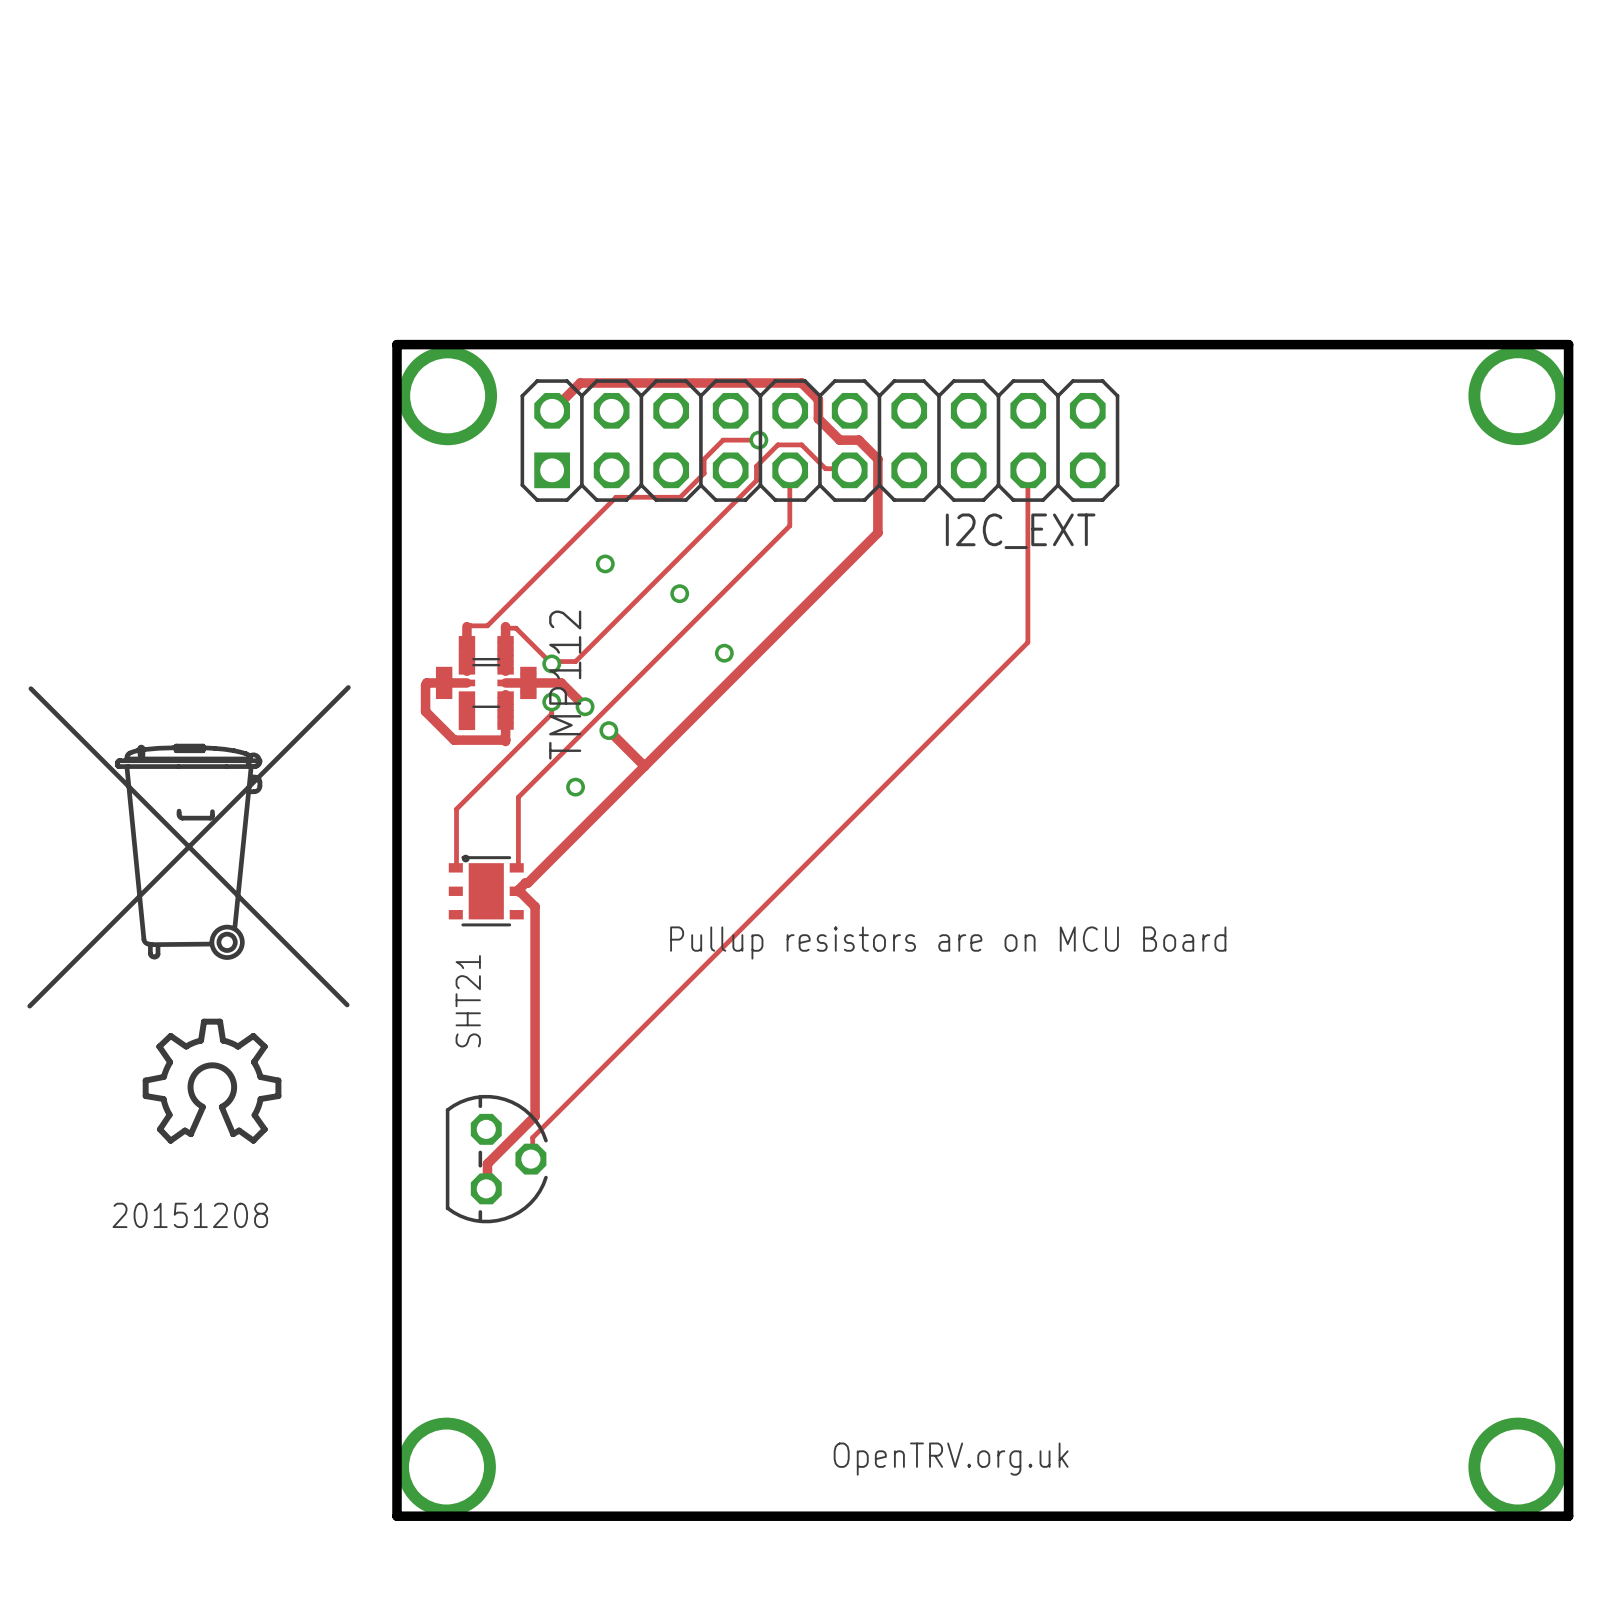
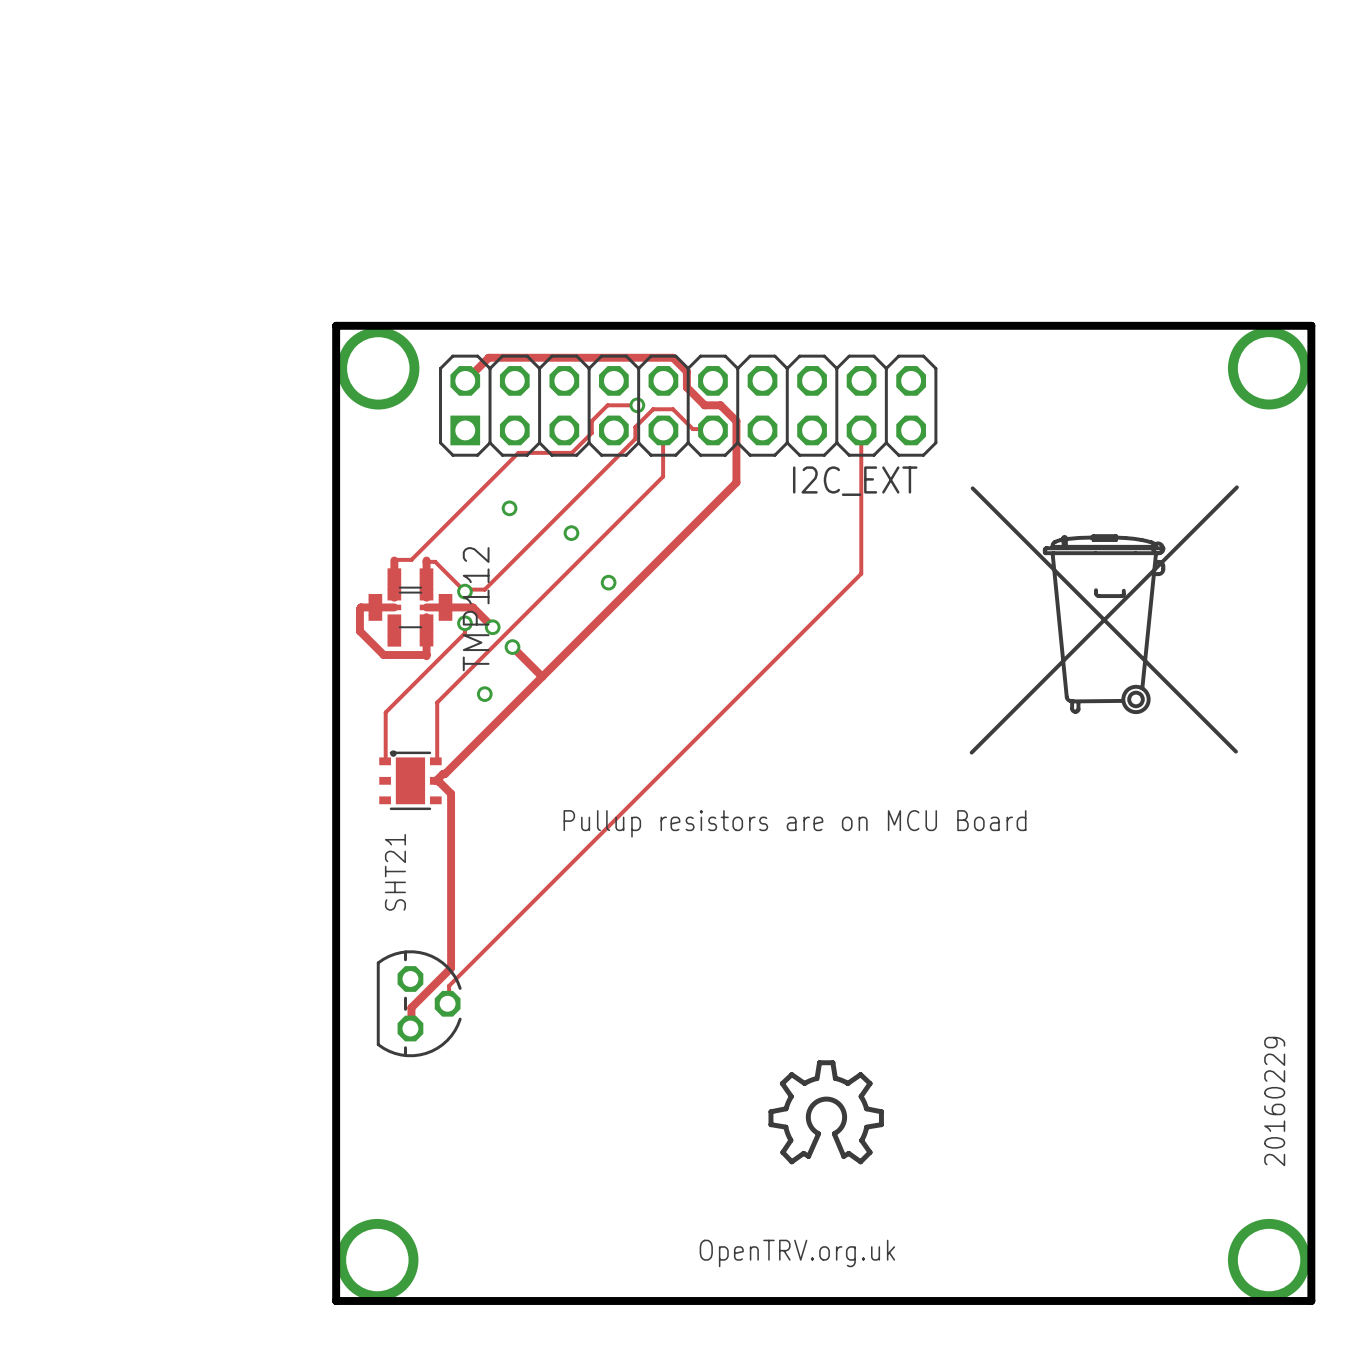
drawing: none -> [969, 485, 1239, 755]
drawing: [27, 685, 351, 1144] -> none
text: 20151208 (190, 1215) -> none
drawing: none -> [768, 1060, 884, 1165]
text: none -> 20160229 (1274, 1101)

